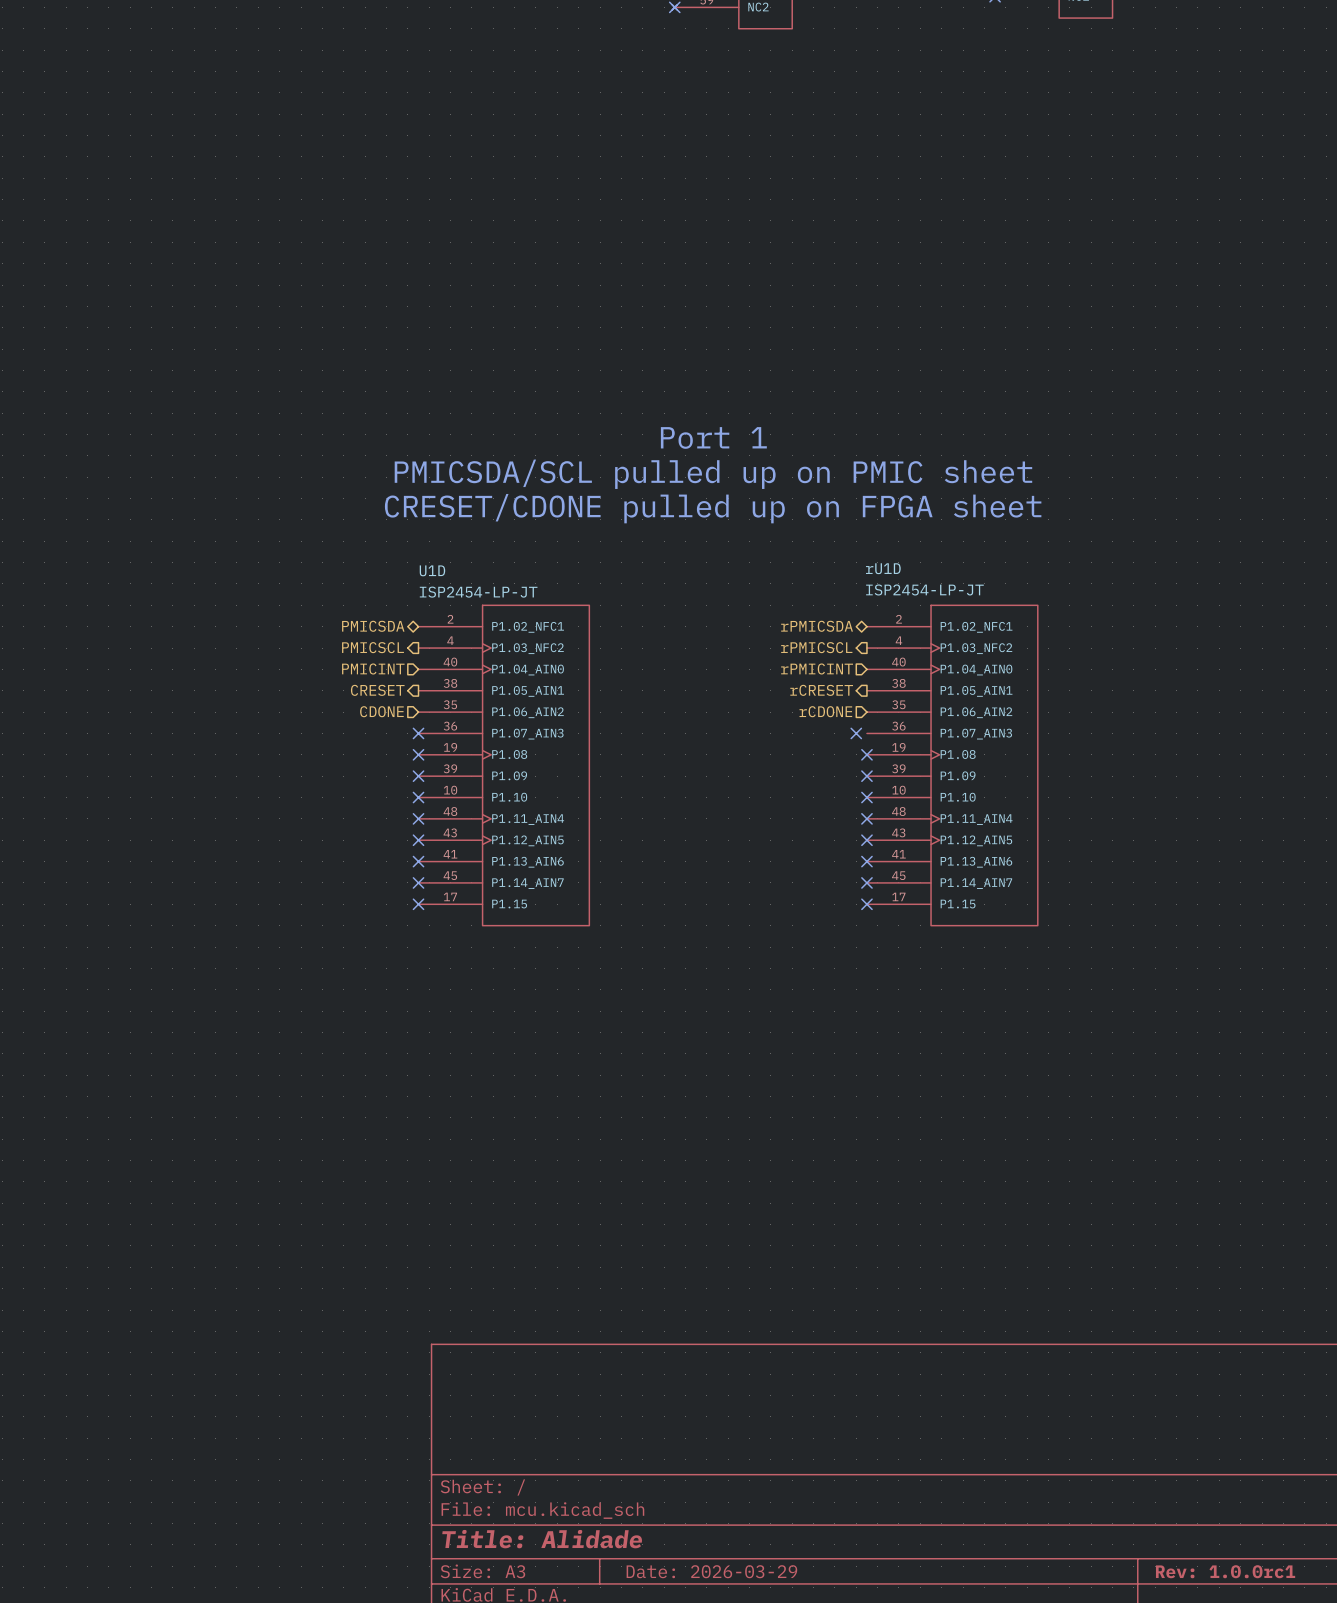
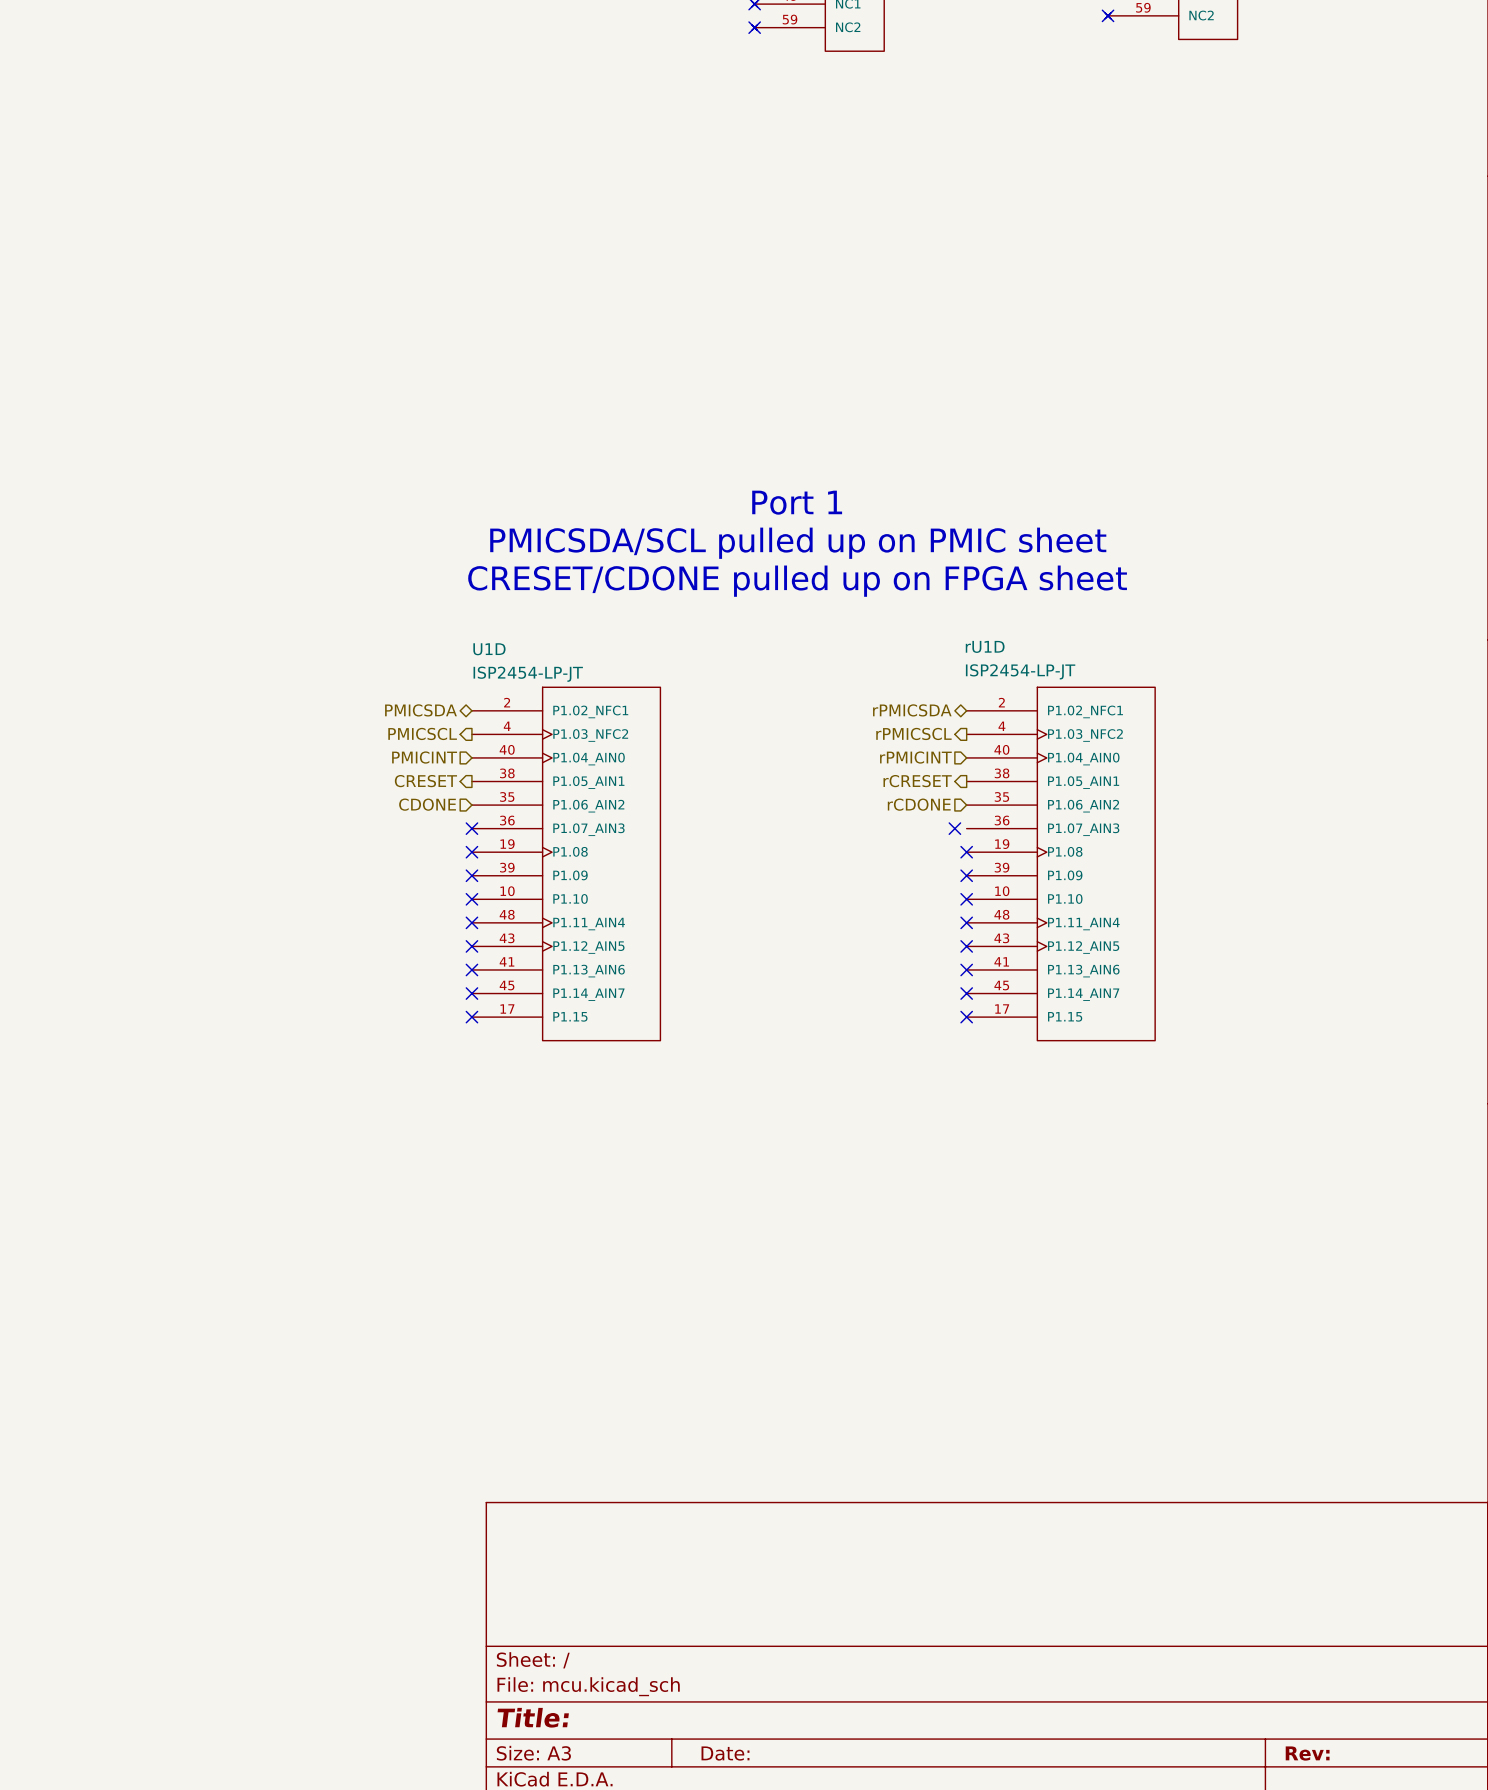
title block: Title: Alidade (542, 1539) -> Title: (533, 1717)
title block: Date: 2026-03-29 (711, 1571) -> Date: (725, 1753)
title block: Rev: 1.0.0rc1 (1225, 1571) -> Rev: (1307, 1753)

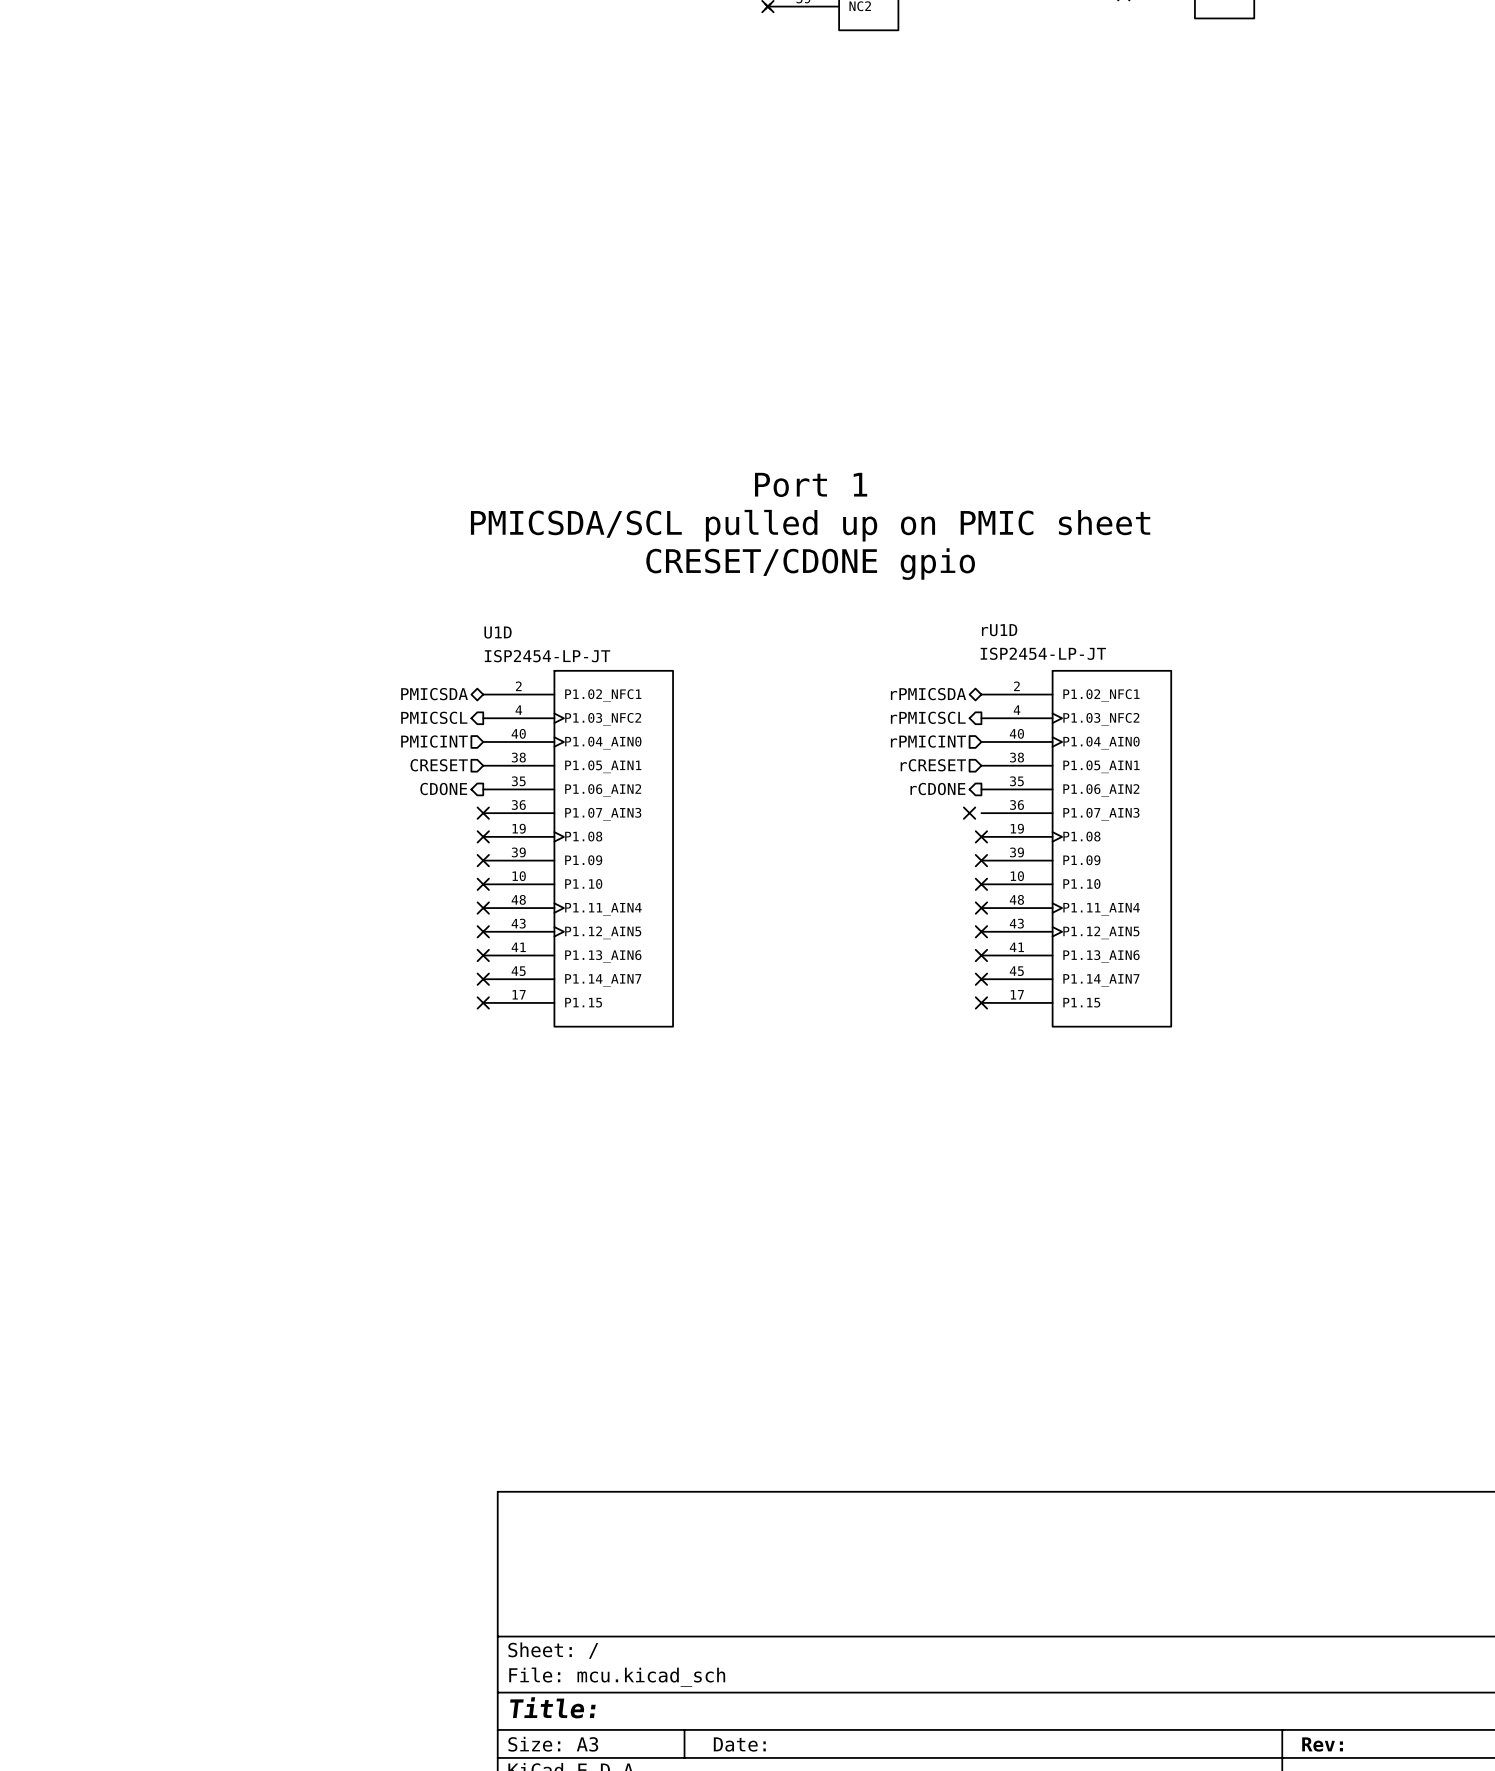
text: CRESET/CDONE pulled up on FPGA sheet (797, 581) -> CRESET/CDONE gpio (810, 564)
hierarchical label shape: output (425, 781) -> input (439, 765)
hierarchical label shape: output (917, 781) -> input (933, 765)
hierarchical label shape: input (427, 804) -> output (443, 789)
hierarchical label shape: input (919, 804) -> output (937, 789)

